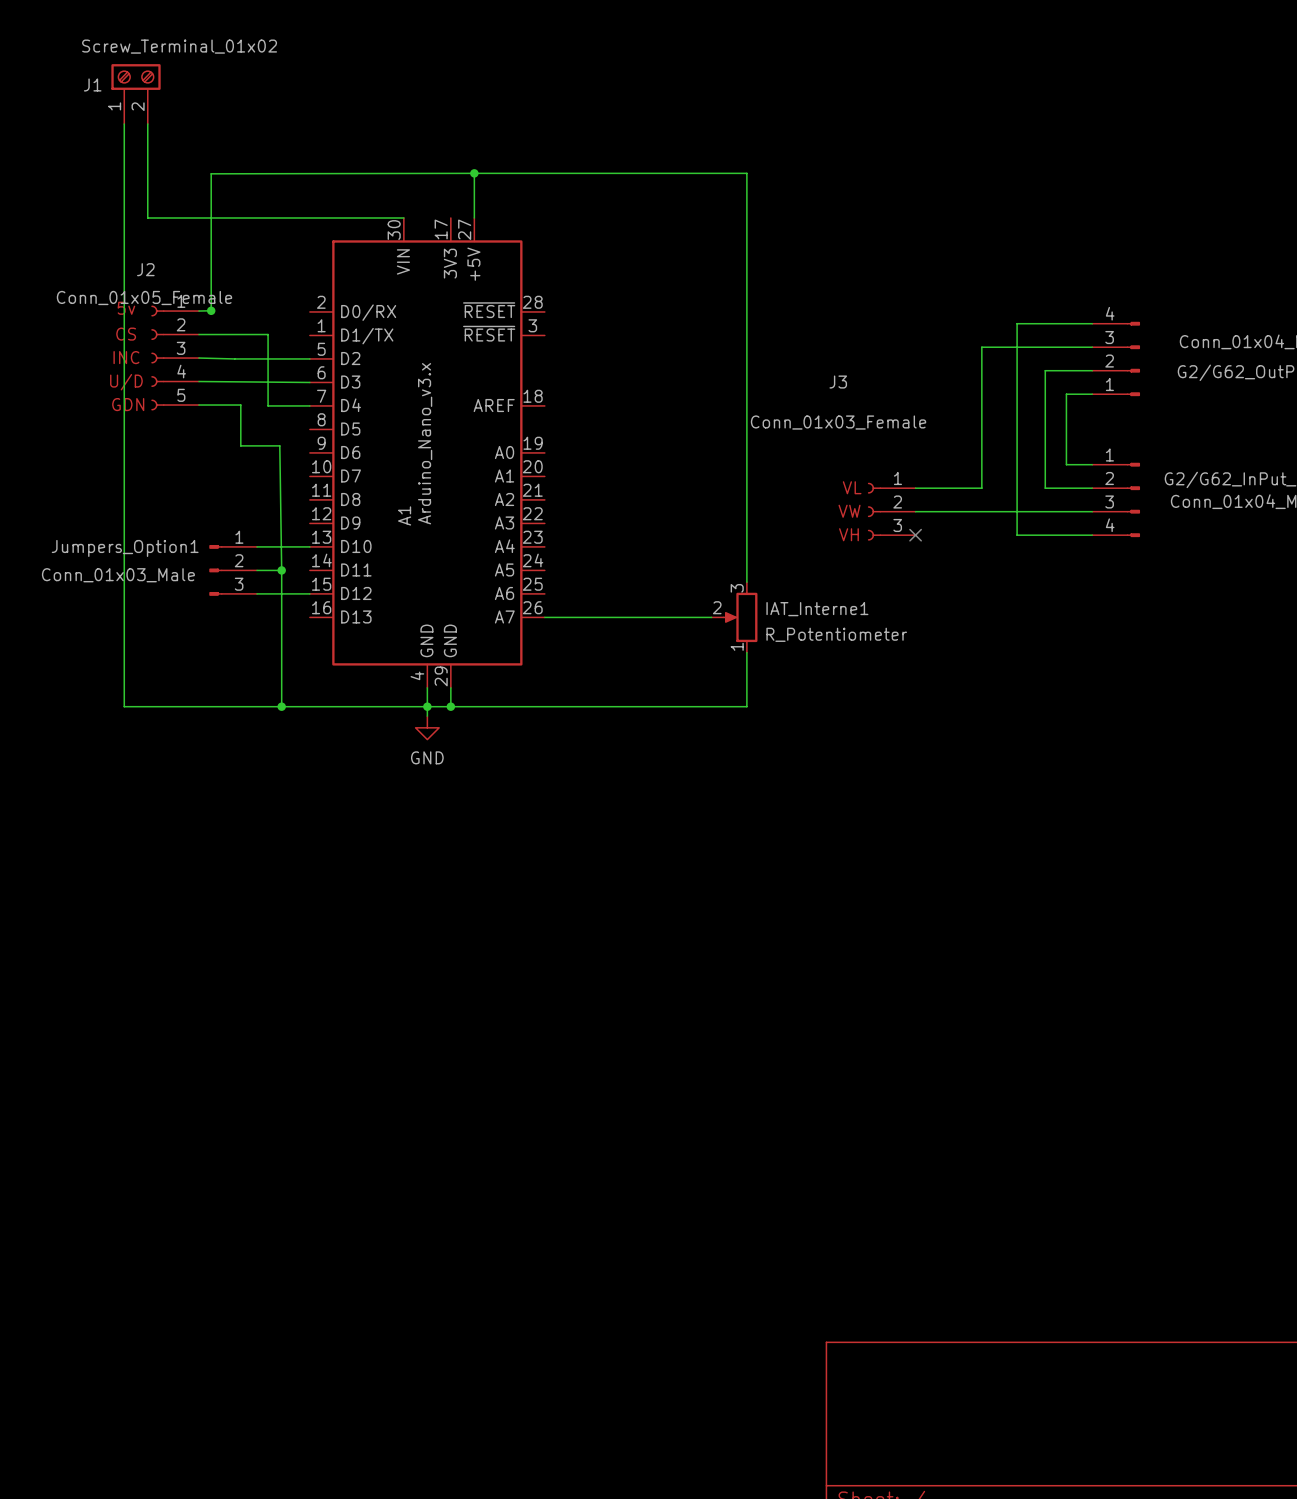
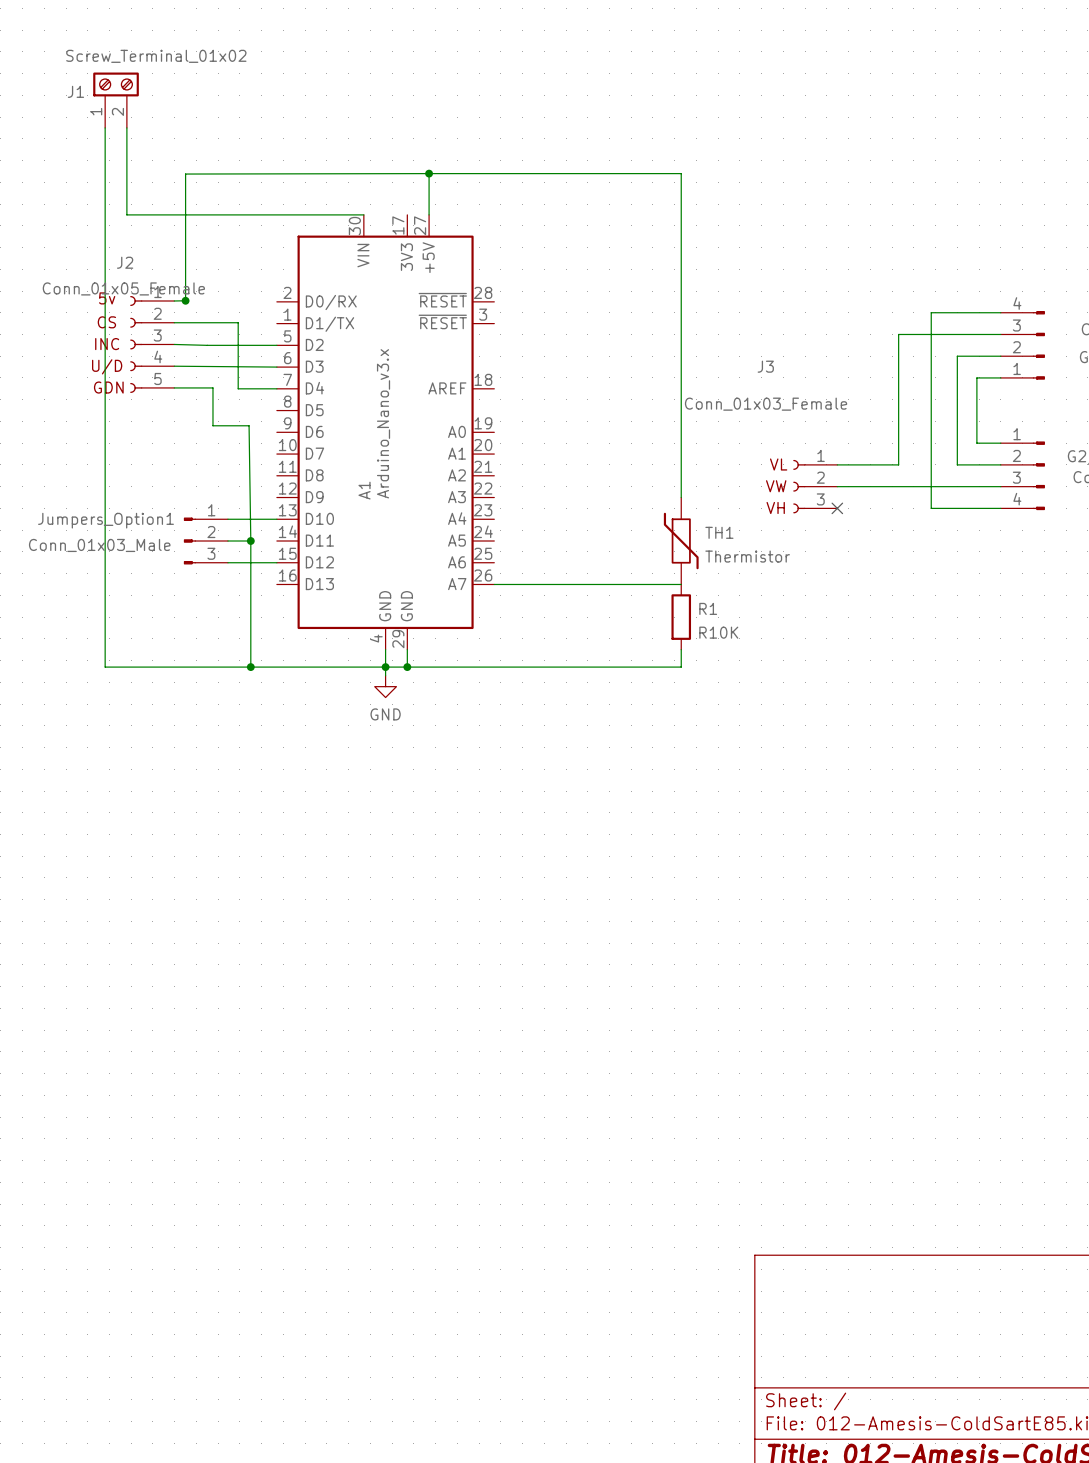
wire: (746, 523) (746, 582) -> none
TH1: none -> Thermistor (681, 541)
IAT_Interne1: R_Potentiometer (734, 617) -> none
wire: (746, 652) (746, 687) -> none
R1: none -> R10K (681, 617)

